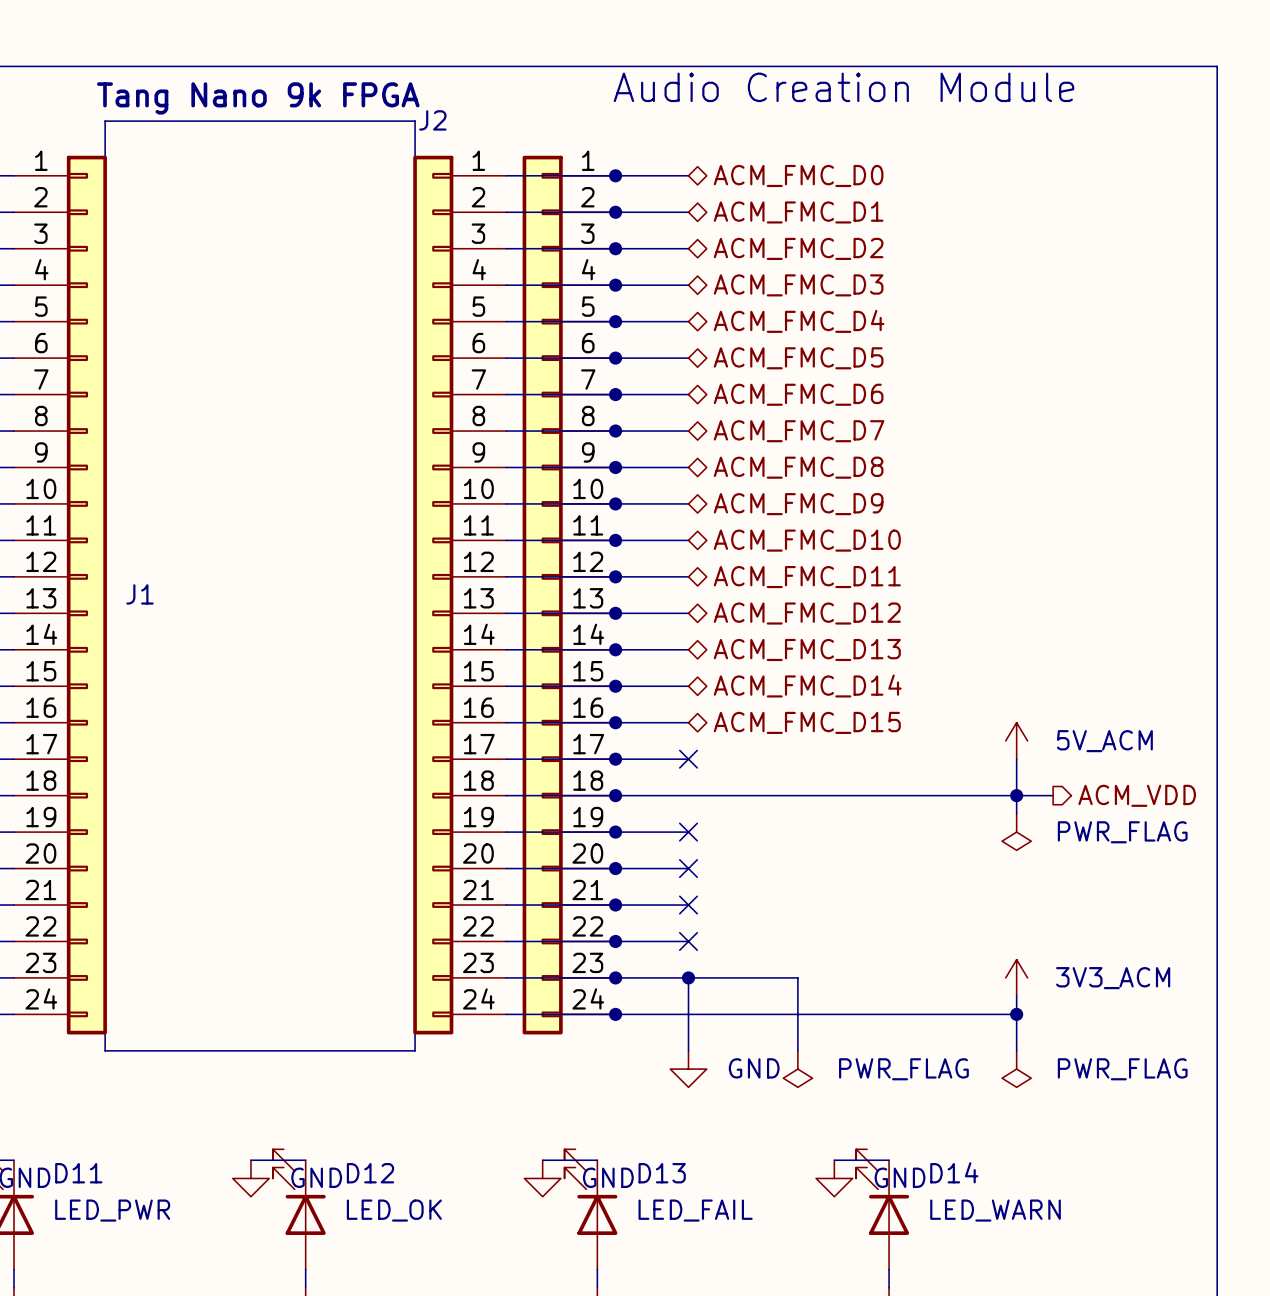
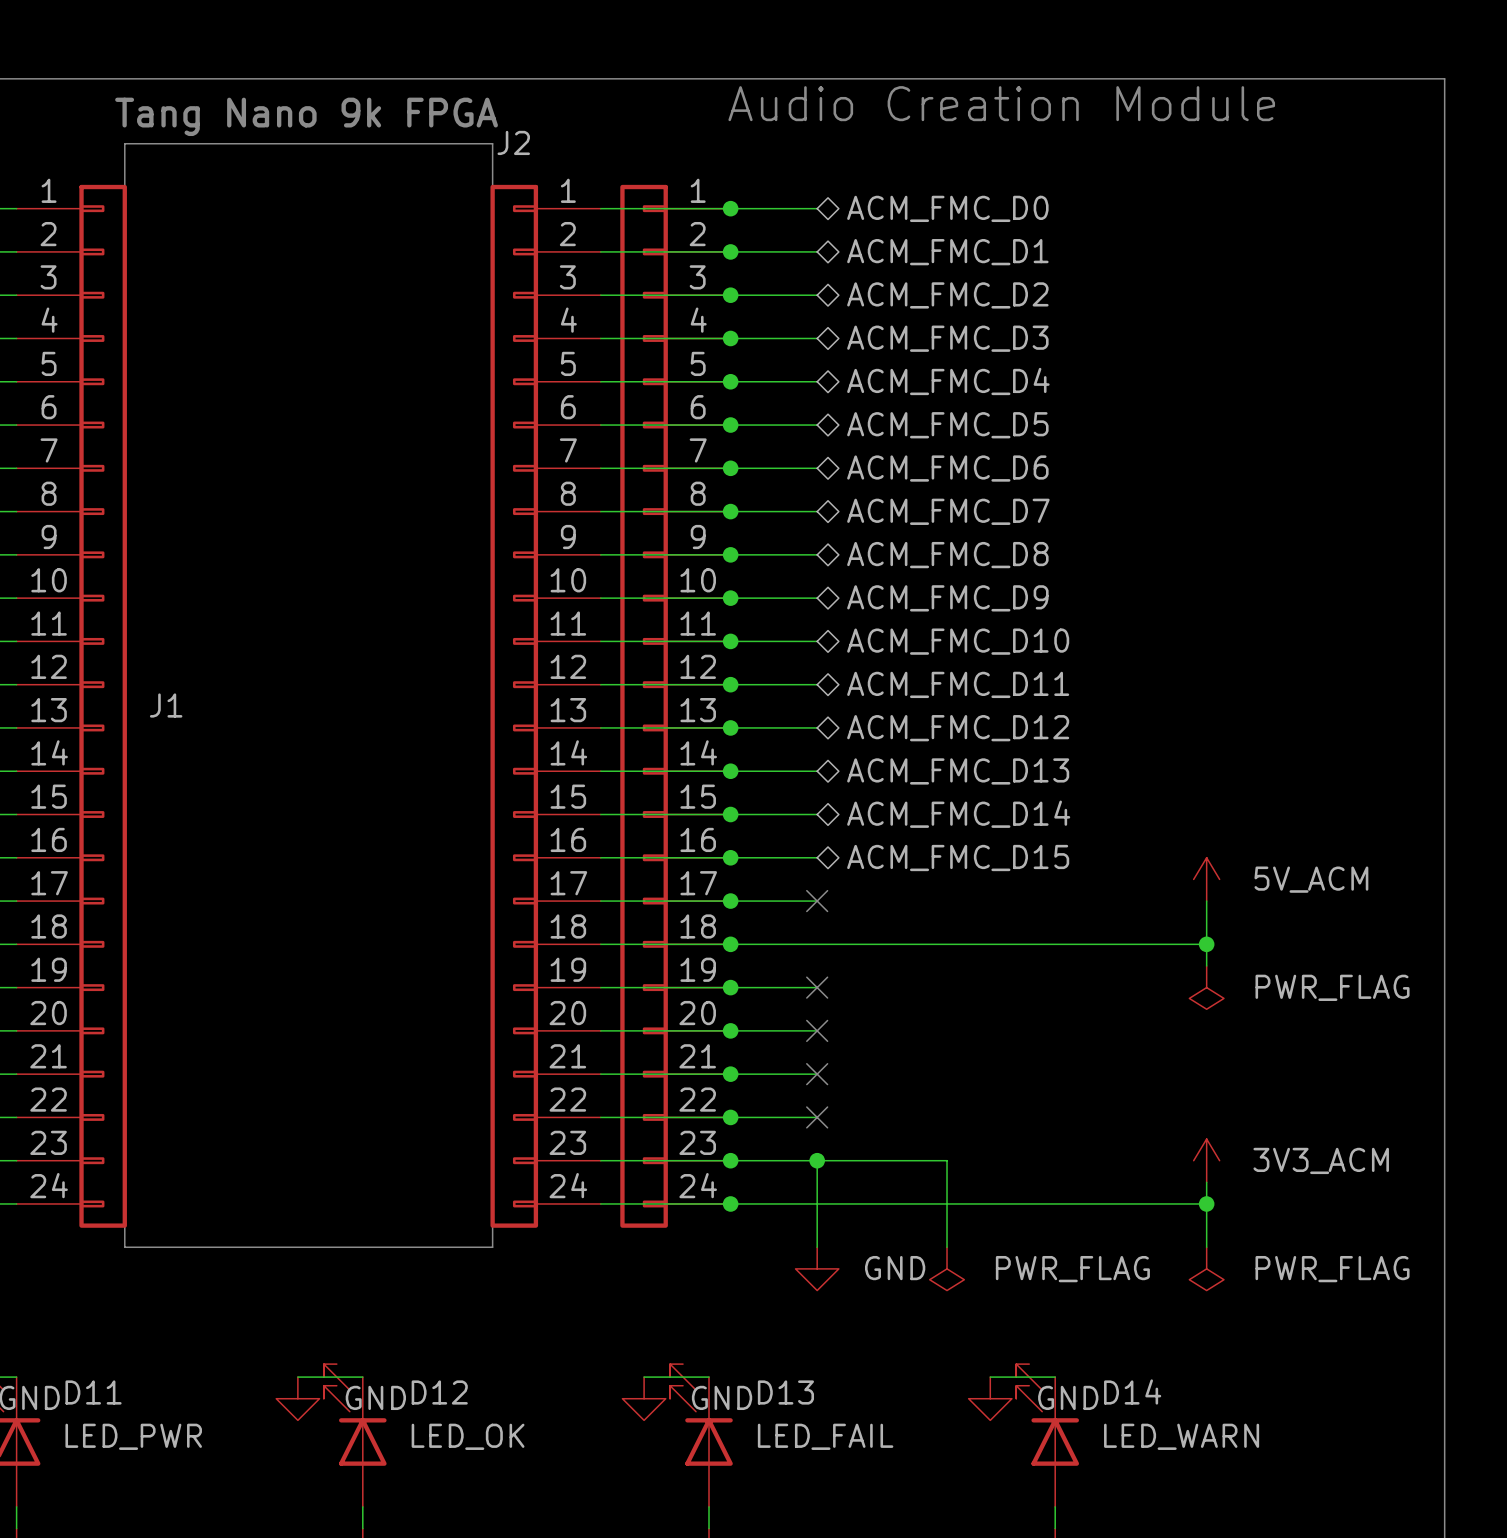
wire: (1016, 795) (1053, 795) -> none
hierarchical label: ACM_VDD (1137, 795) -> none

